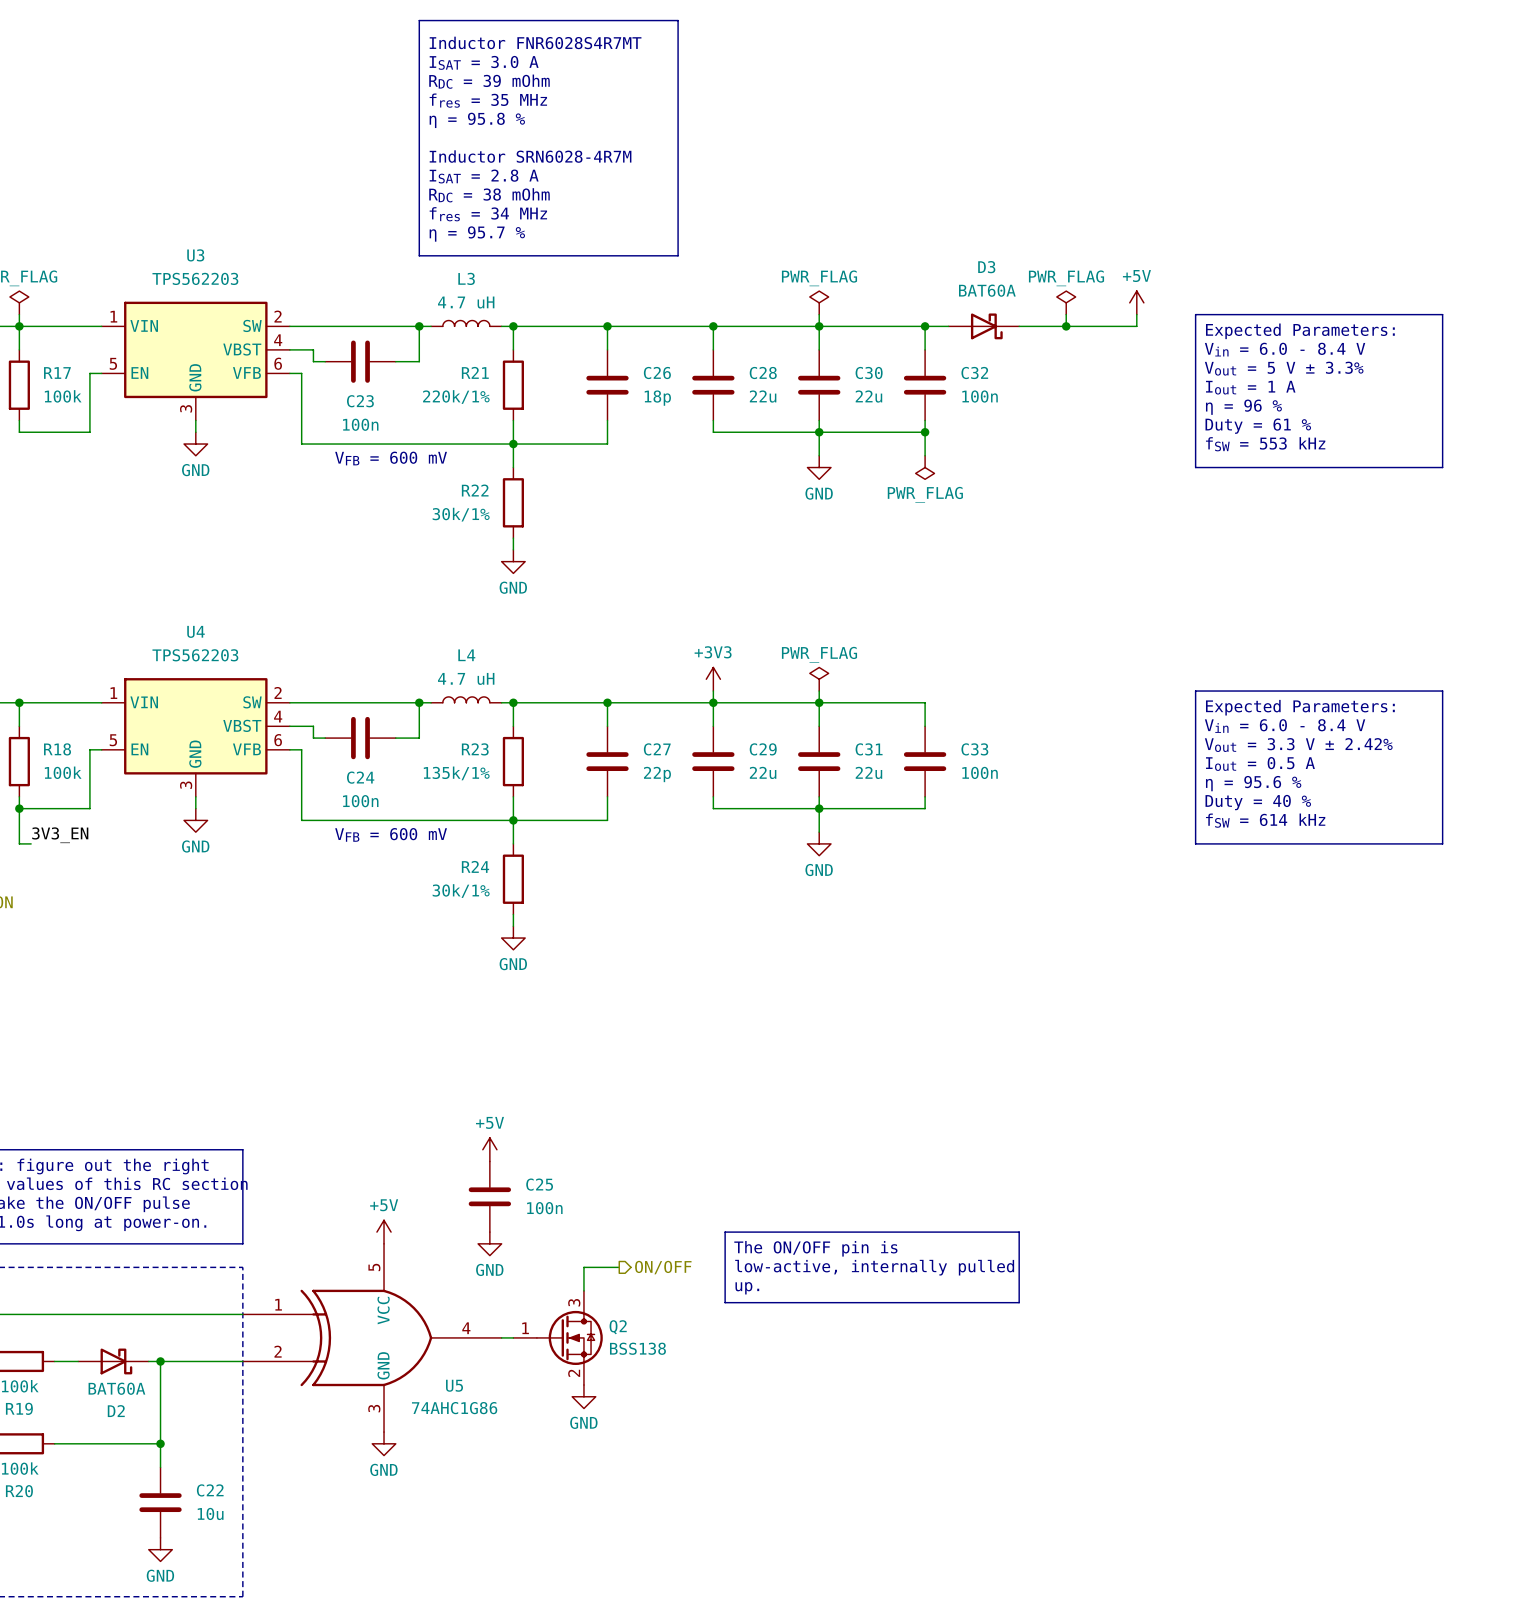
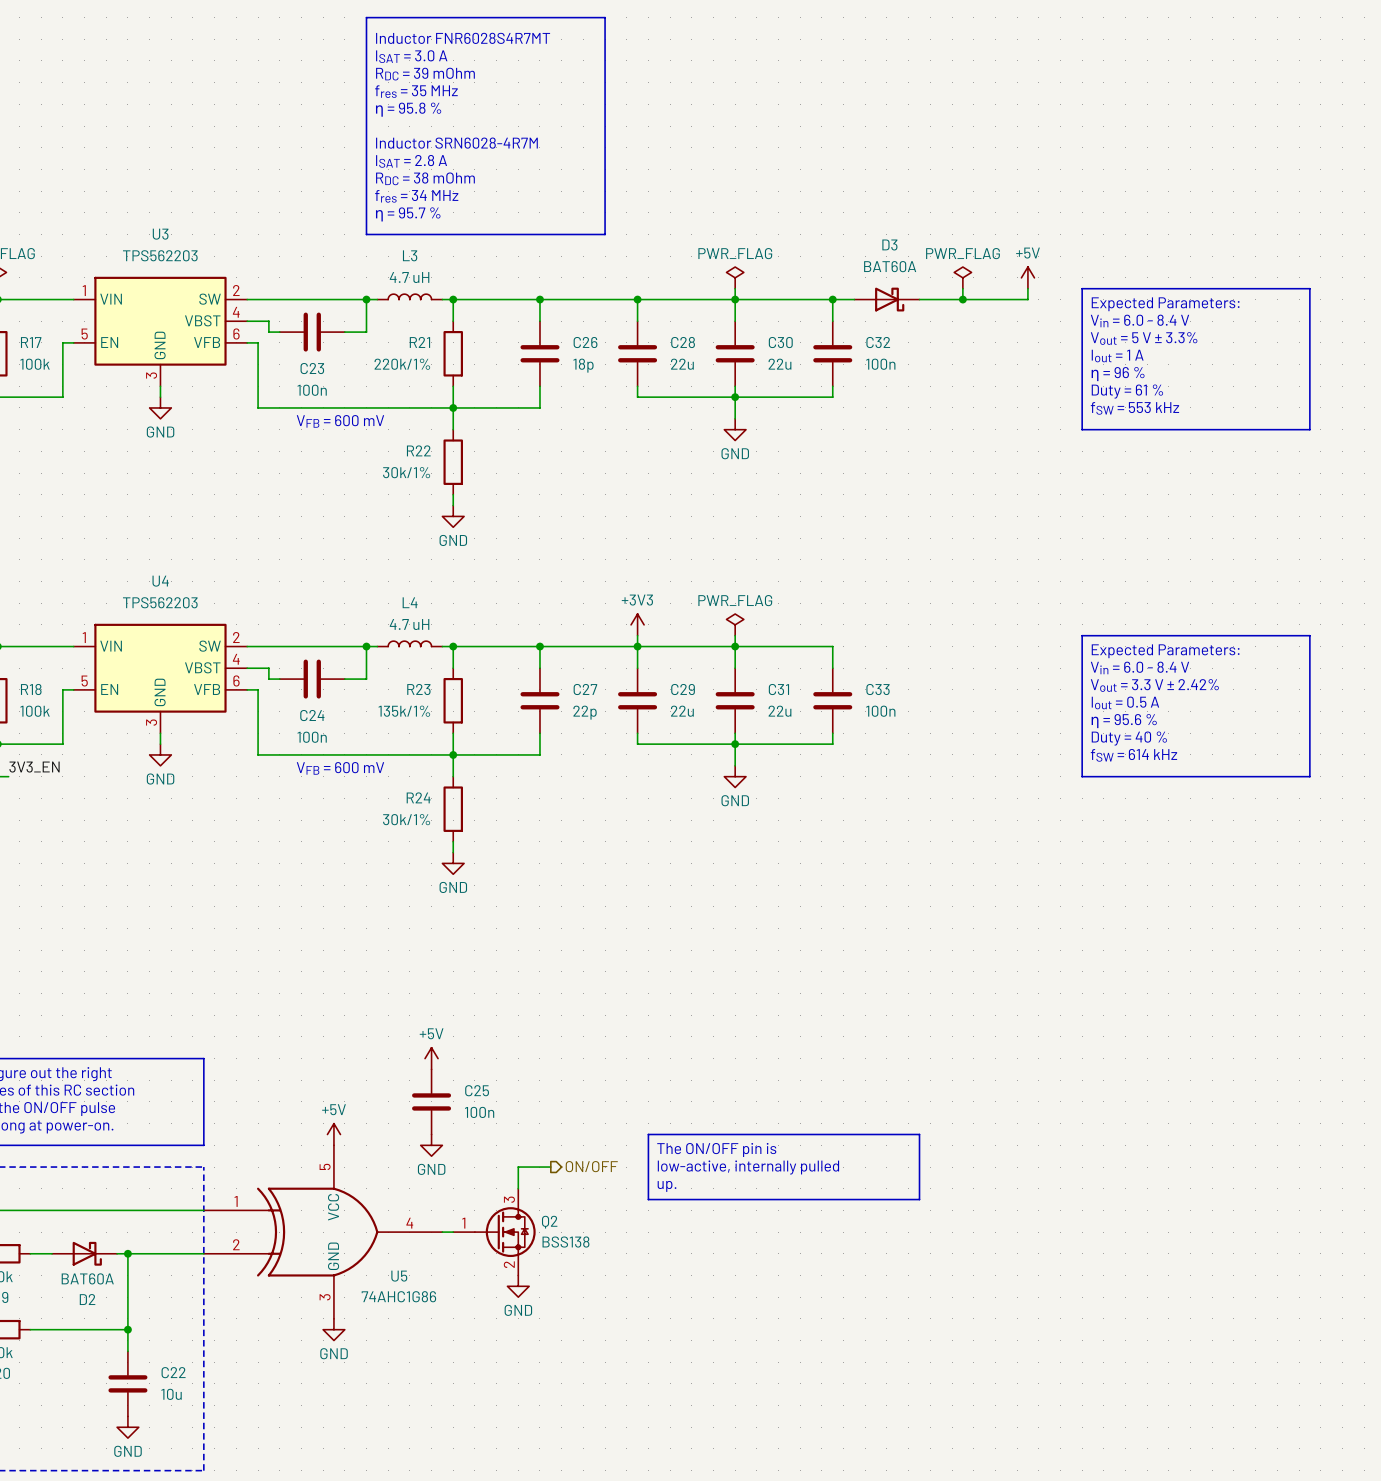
wire: (925, 432) (925, 455) -> none
junction: (925, 432) -> none
power symbol: PWR_FLAG (925, 467) -> none

